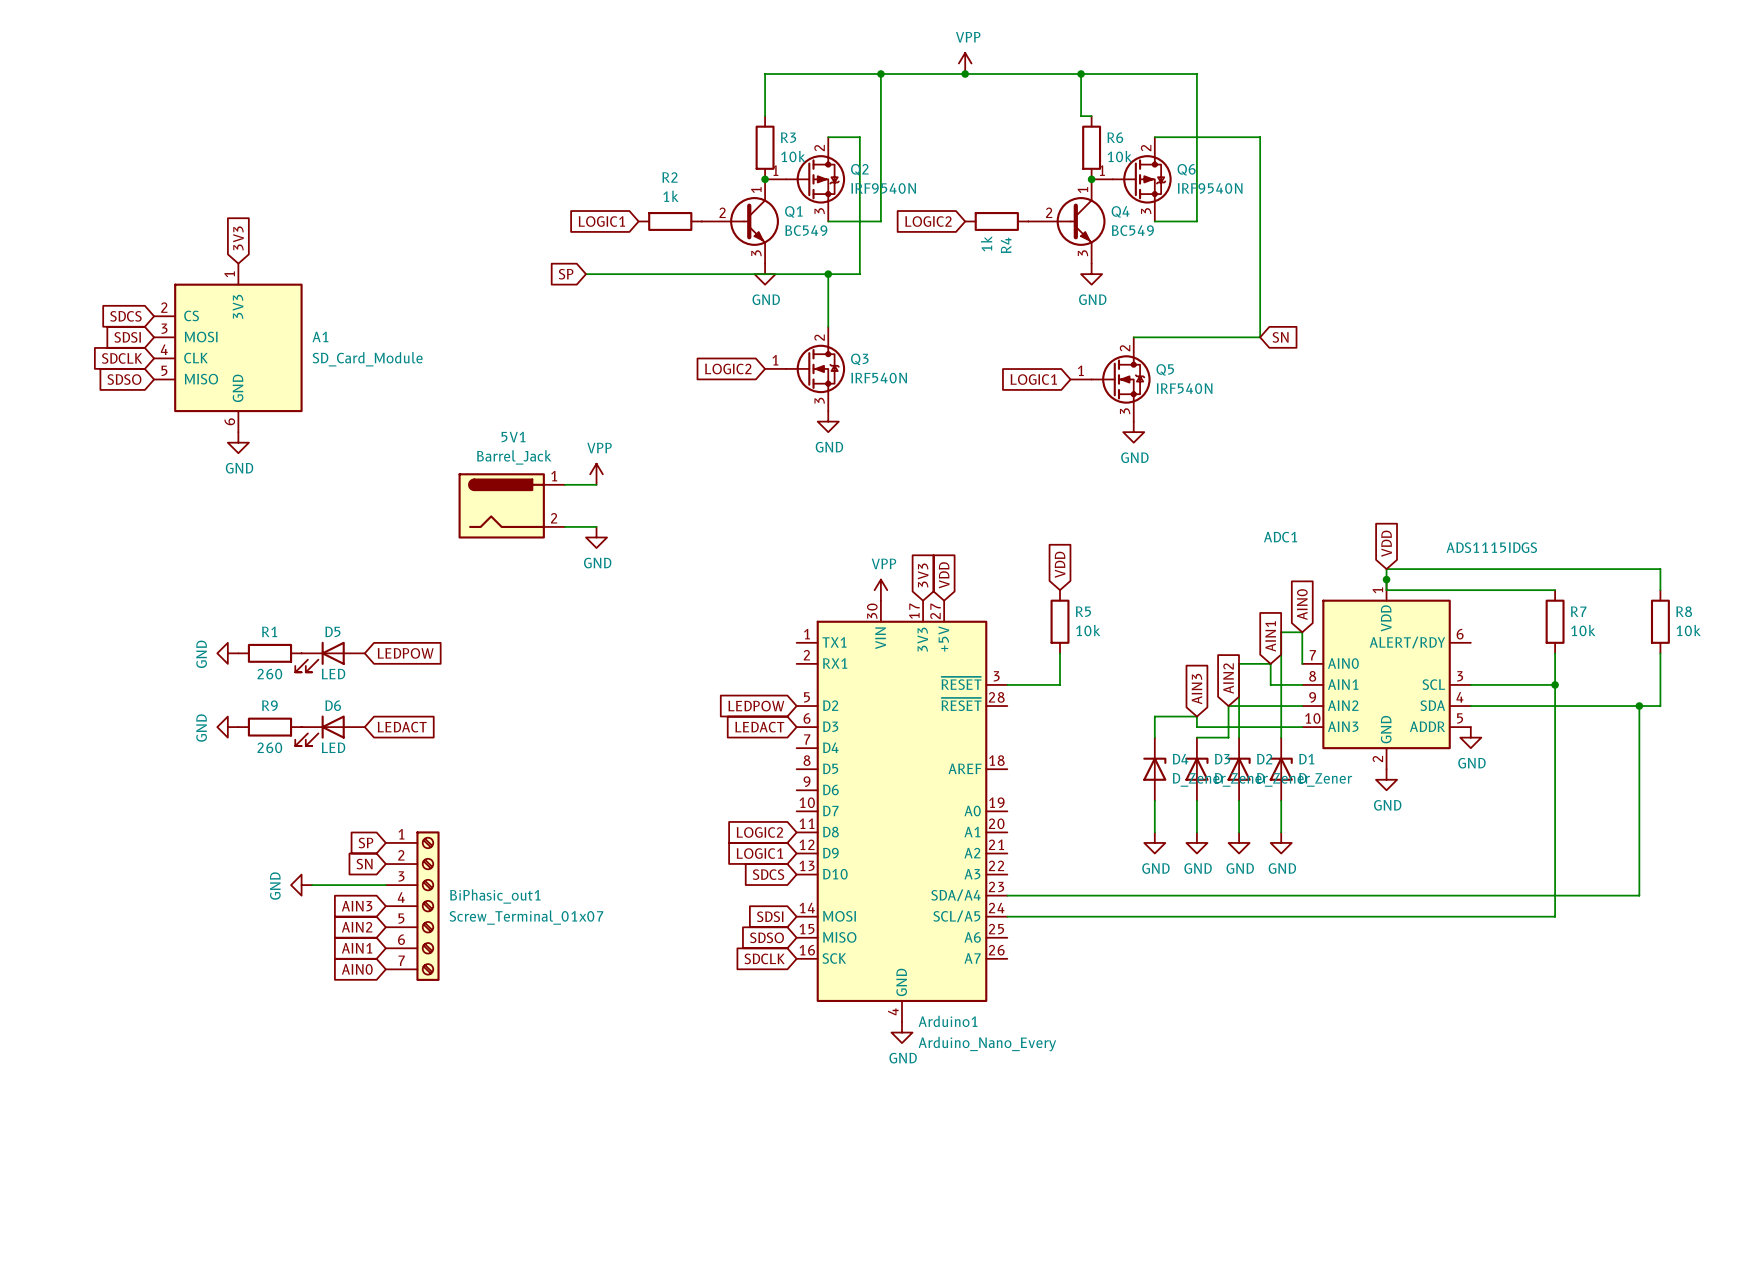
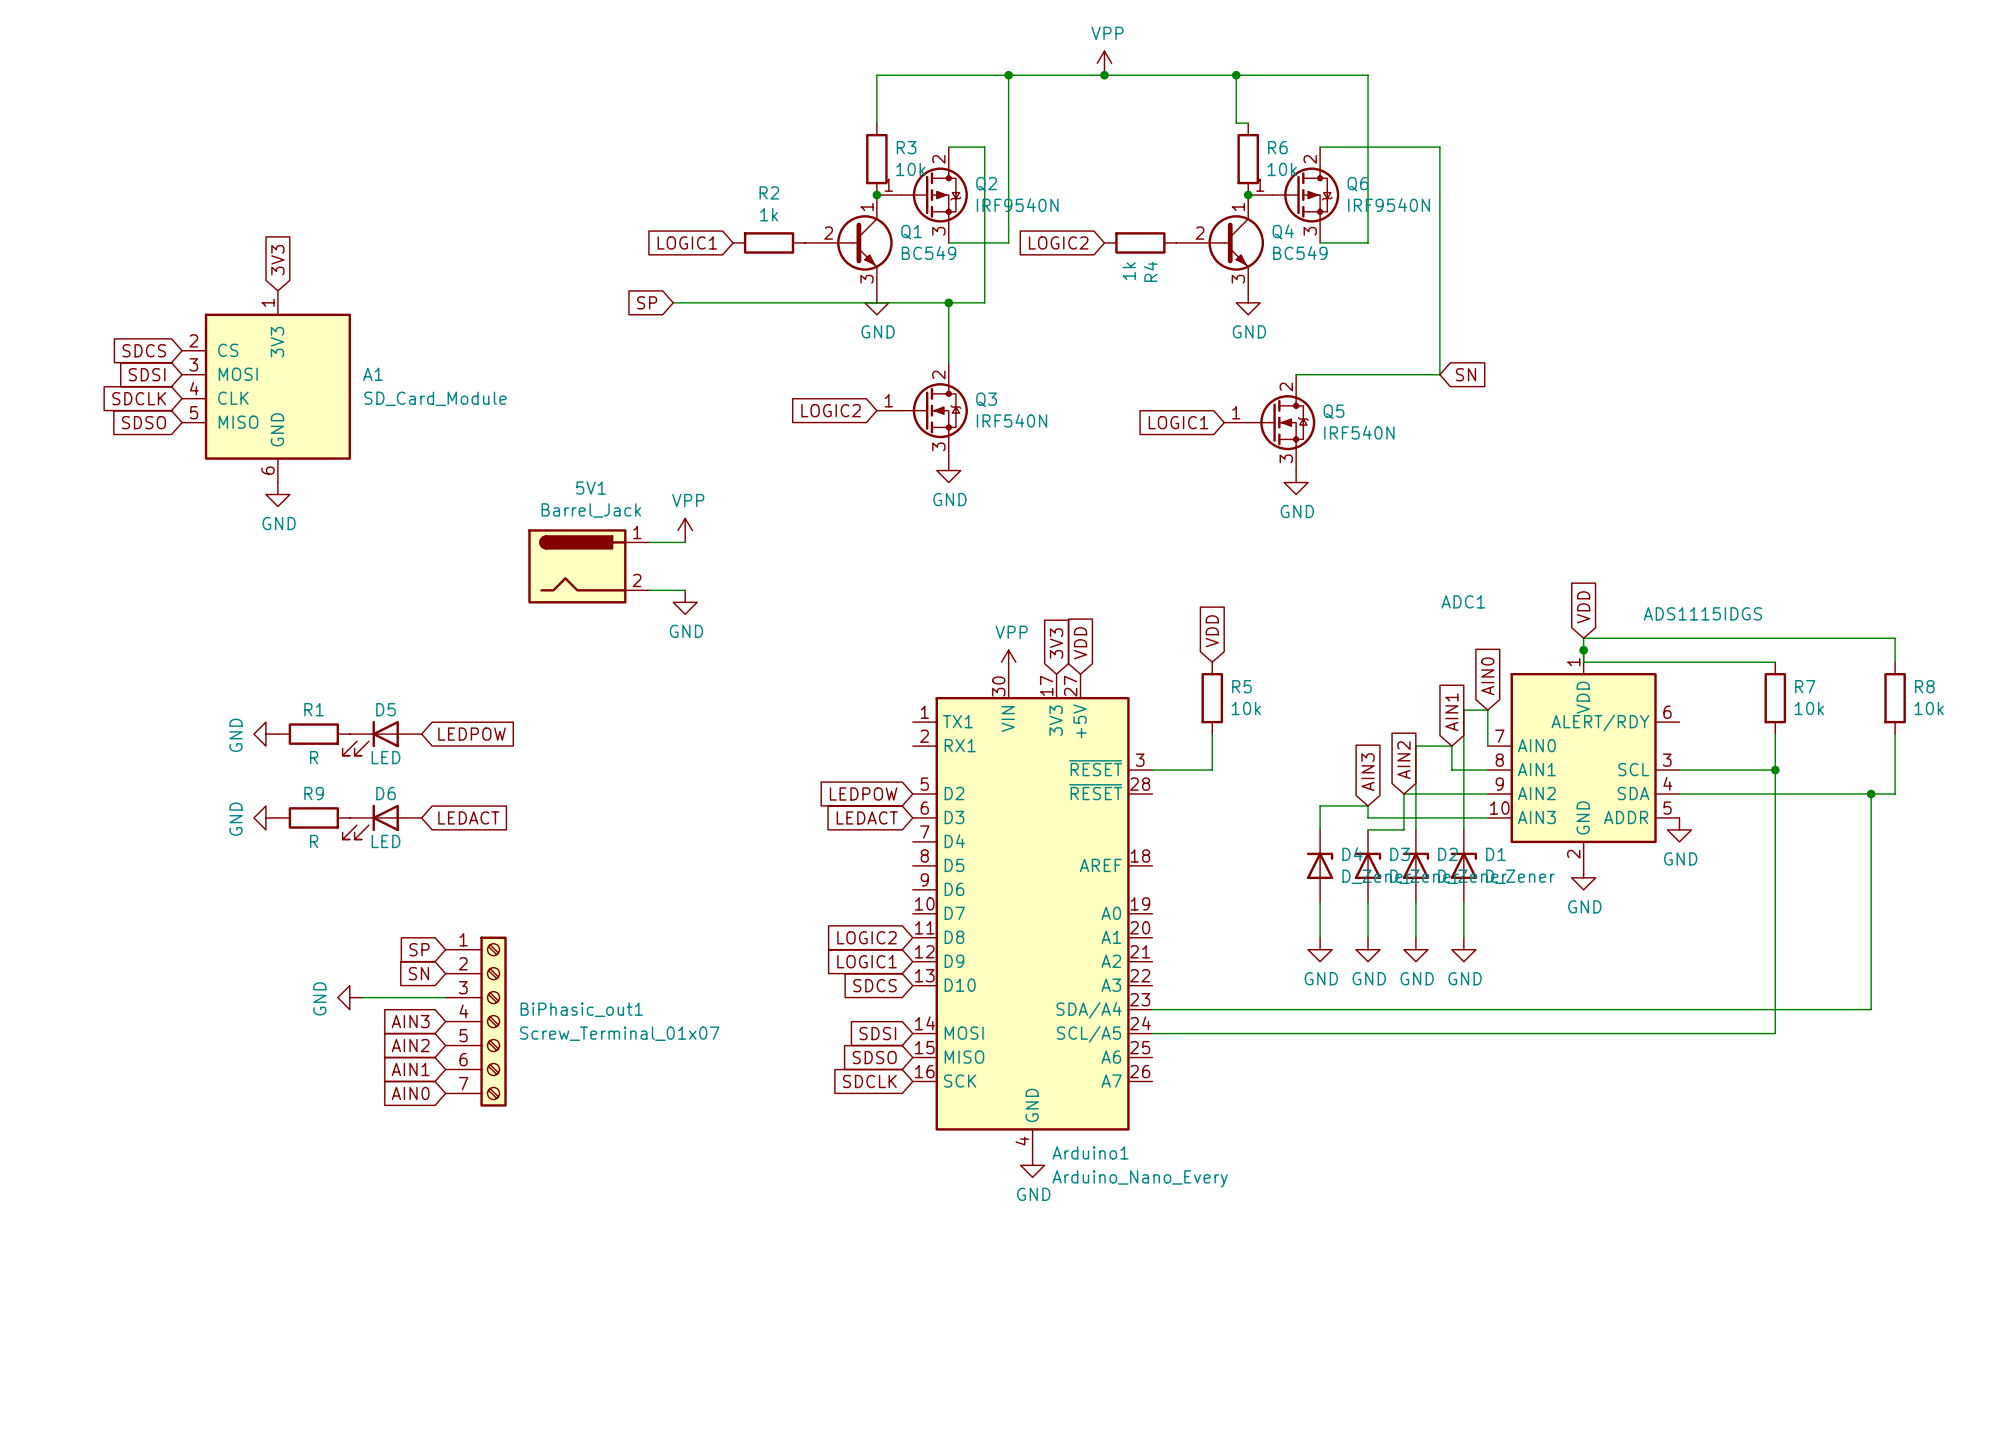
R1 value: 260 (269, 674) -> R (314, 757)
R9 value: 260 (269, 747) -> R (314, 841)

